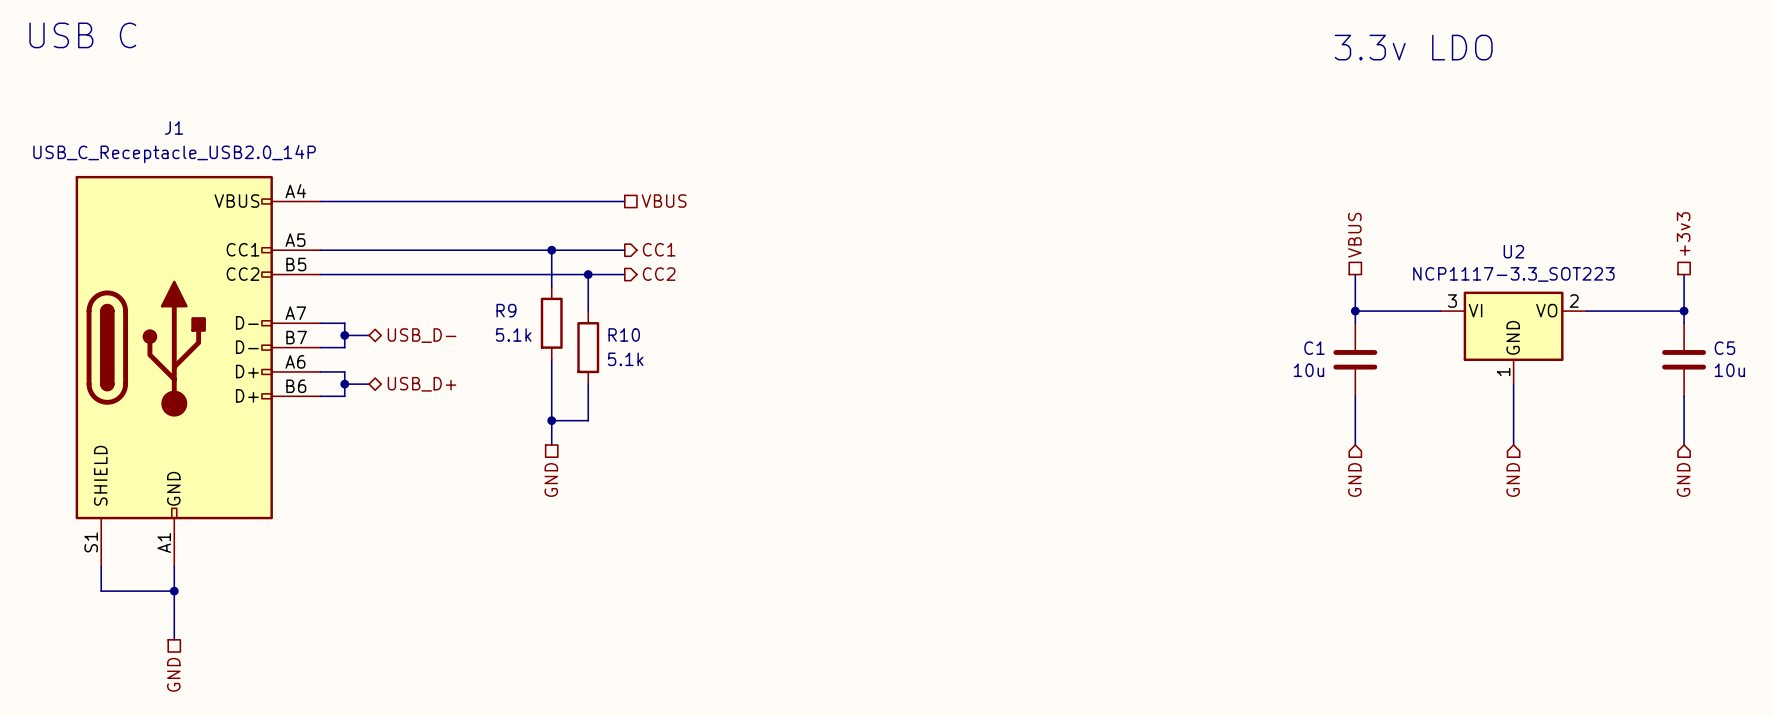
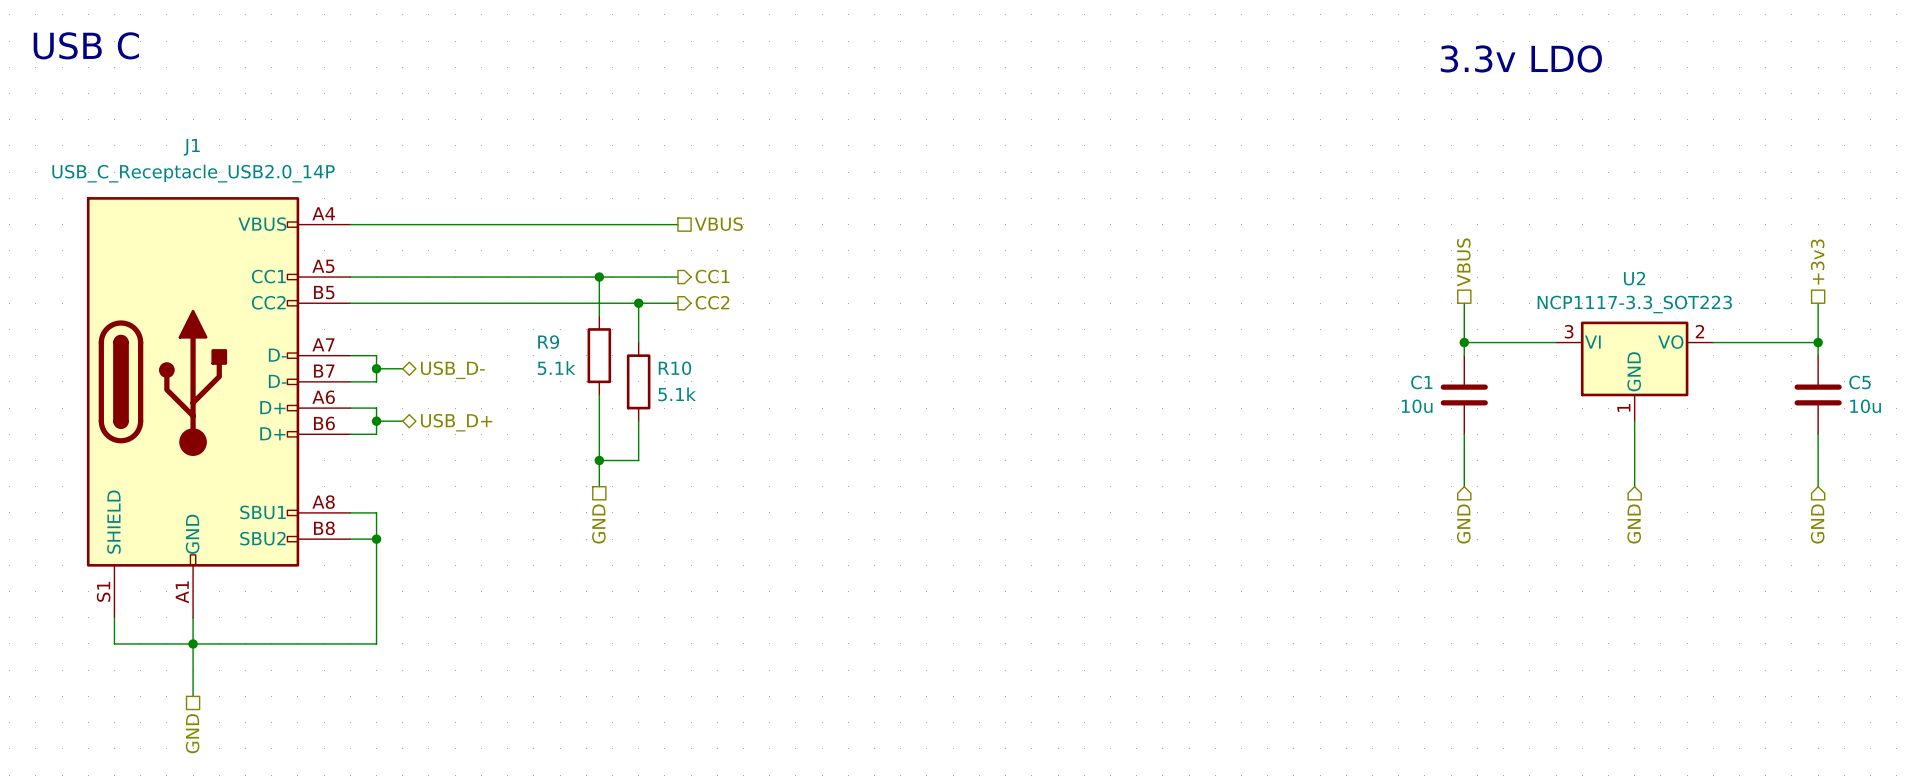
J1 symbol: [75, 175, 321, 567] -> [86, 197, 351, 618]
wire: none -> (350, 512) (376, 512) (376, 643) (193, 643)
wire: none -> (350, 539) (376, 539)
junction: none -> (376, 539)

